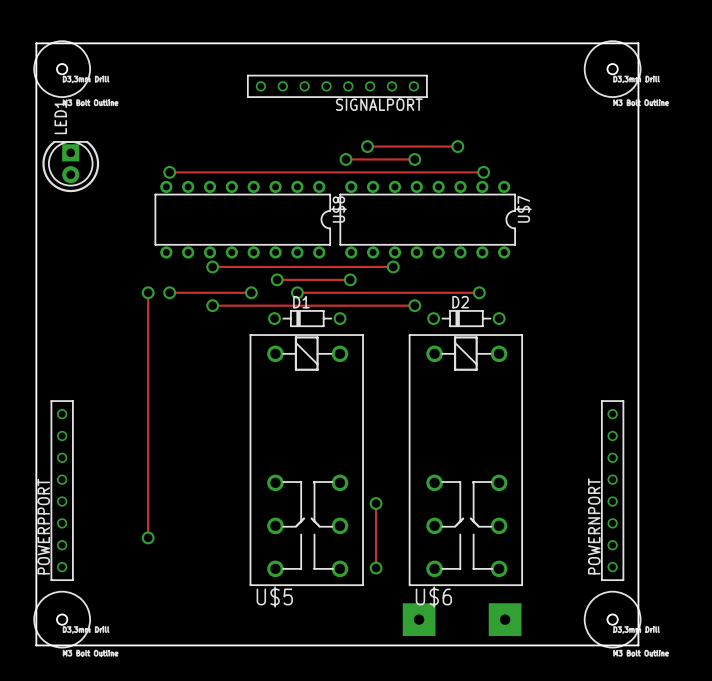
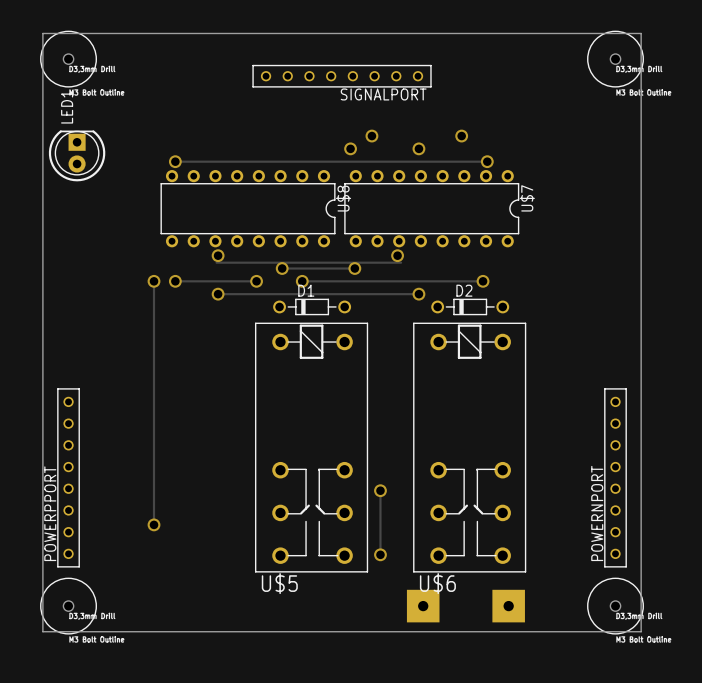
track: (367, 146) (457, 146) -> none
track: (345, 159) (414, 159) -> none
track: (212, 266) (393, 266) -> none
track: none -> (216, 262) (401, 262)

